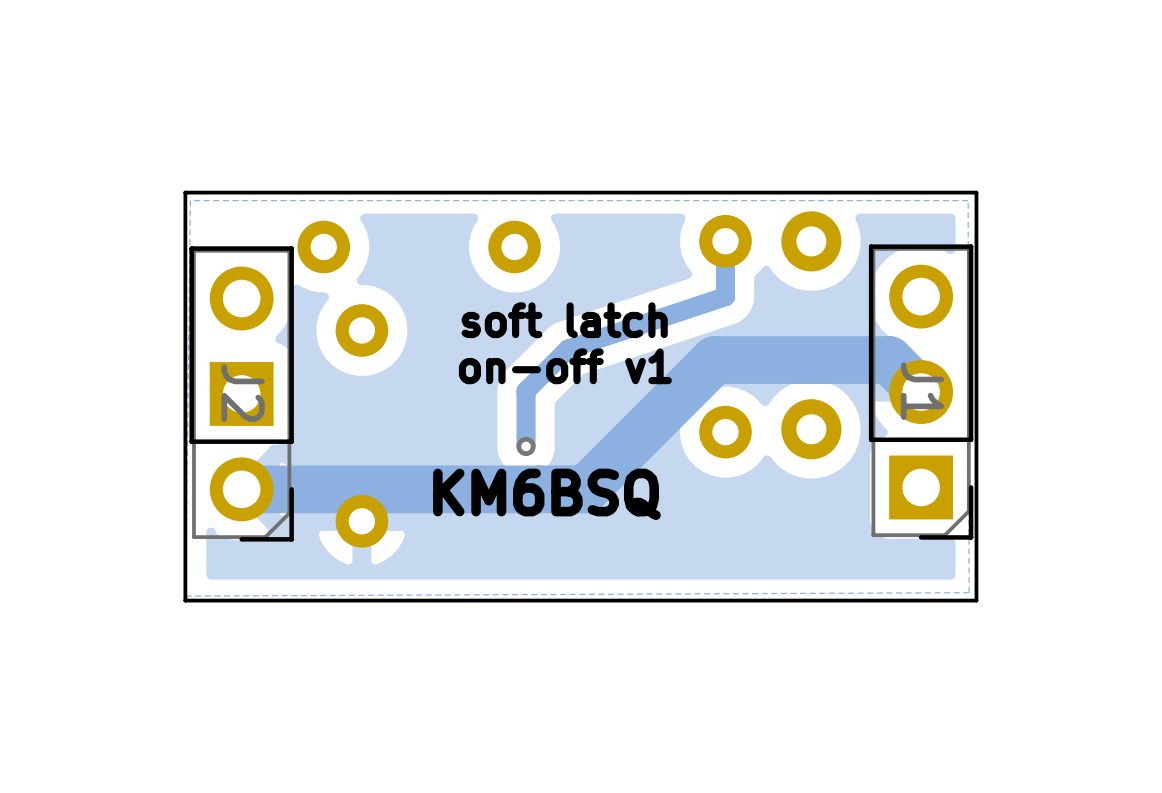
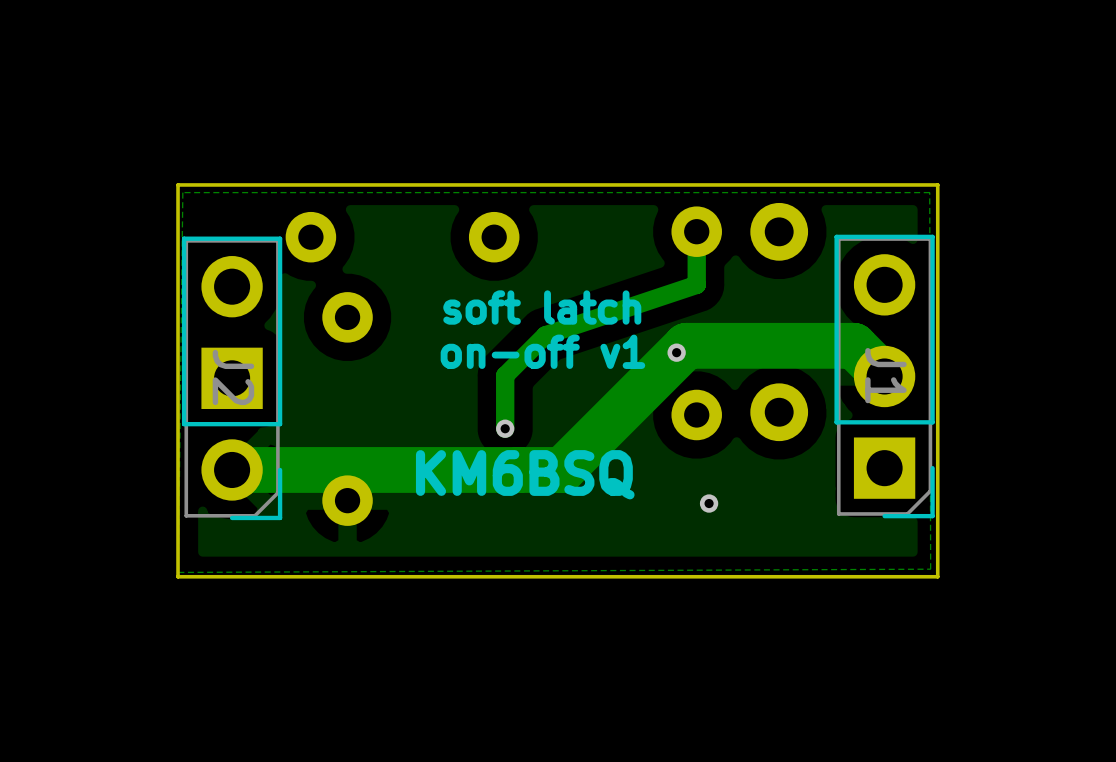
via: none -> (676, 352)
via: none -> (709, 503)

